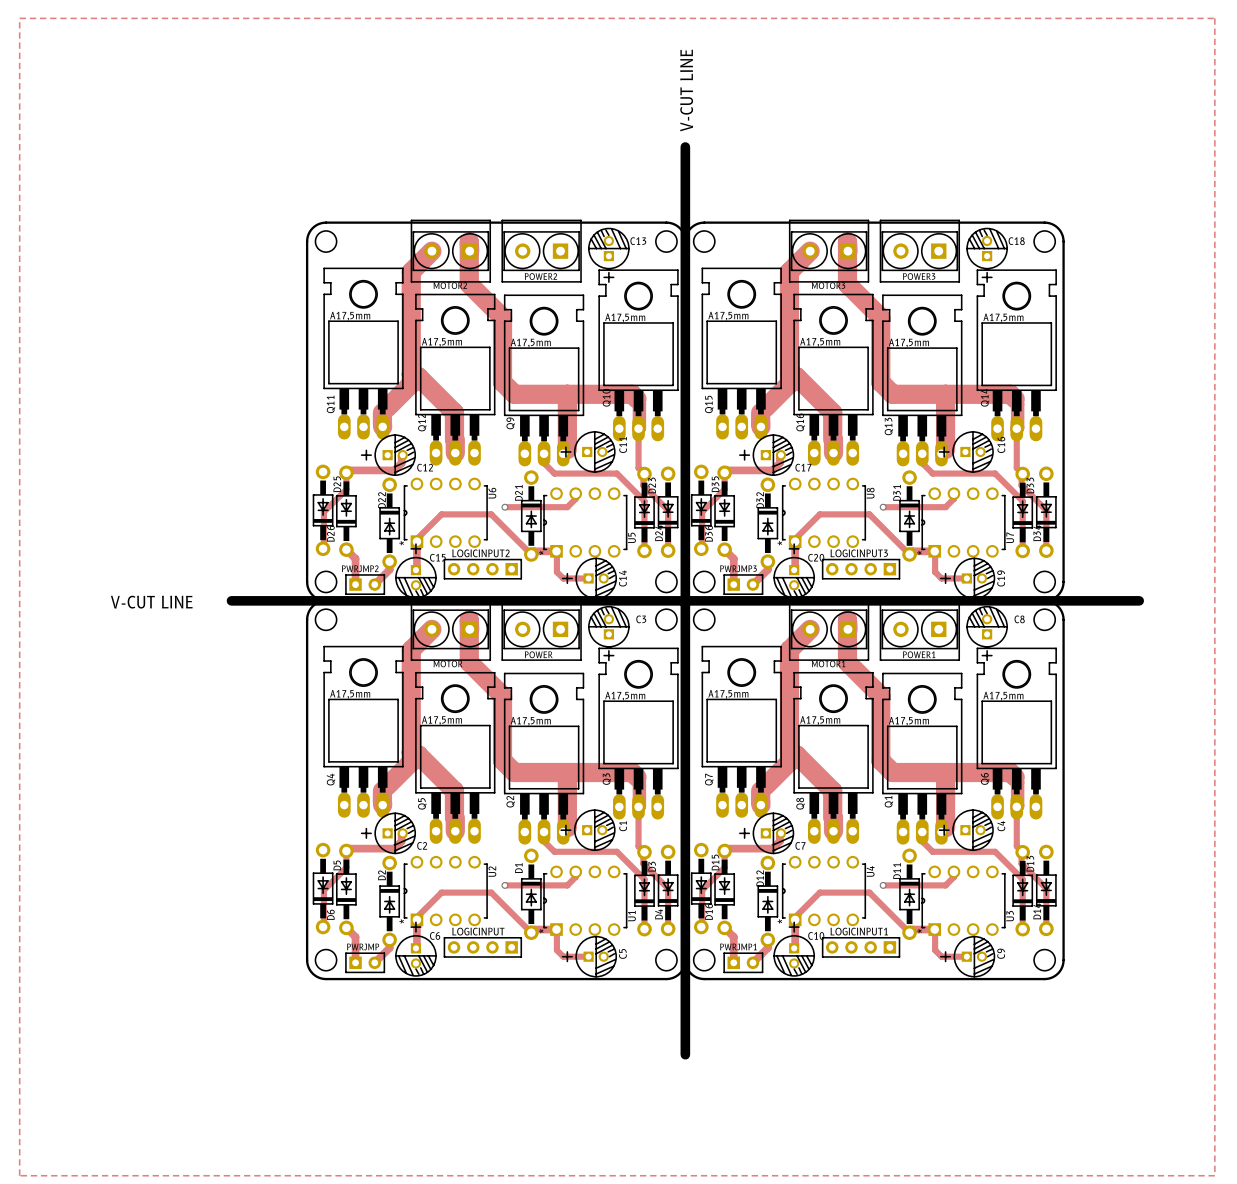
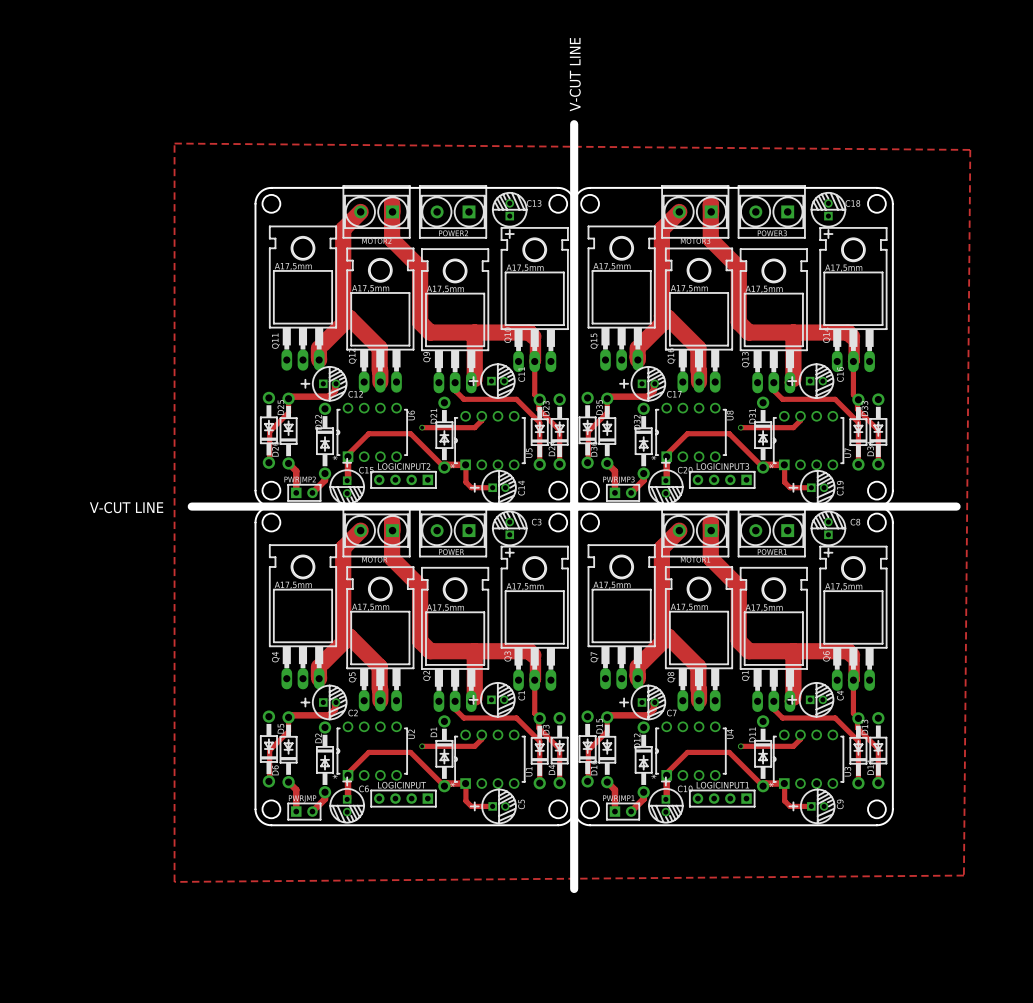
zone outline: (19, 18) (1214, 18) (1214, 1175) (19, 1175) (19, 18) -> (174, 143) (174, 881) (963, 875) (970, 149) (174, 143)

